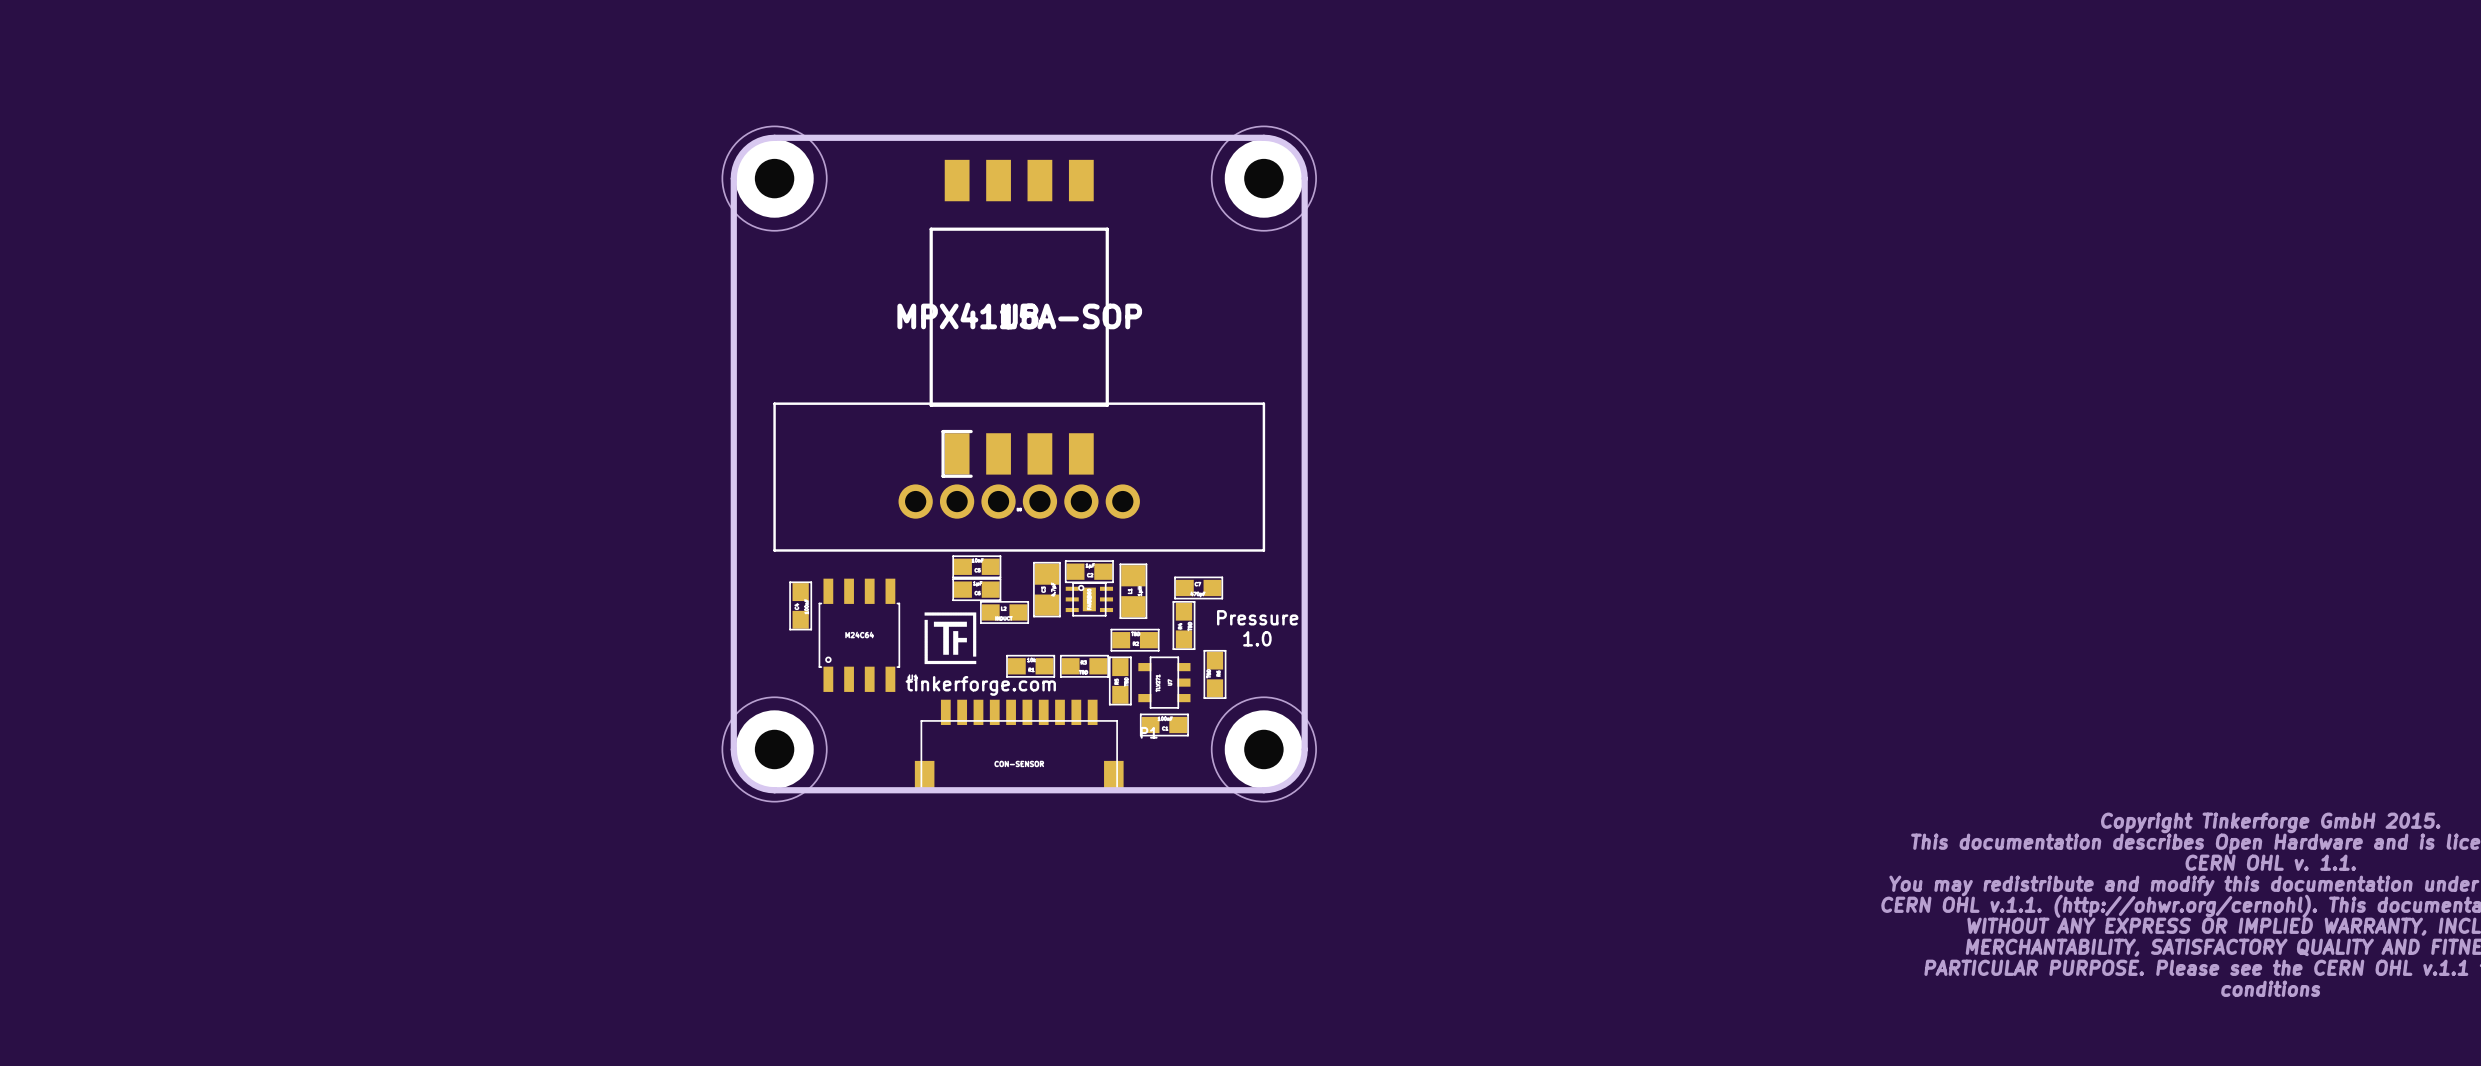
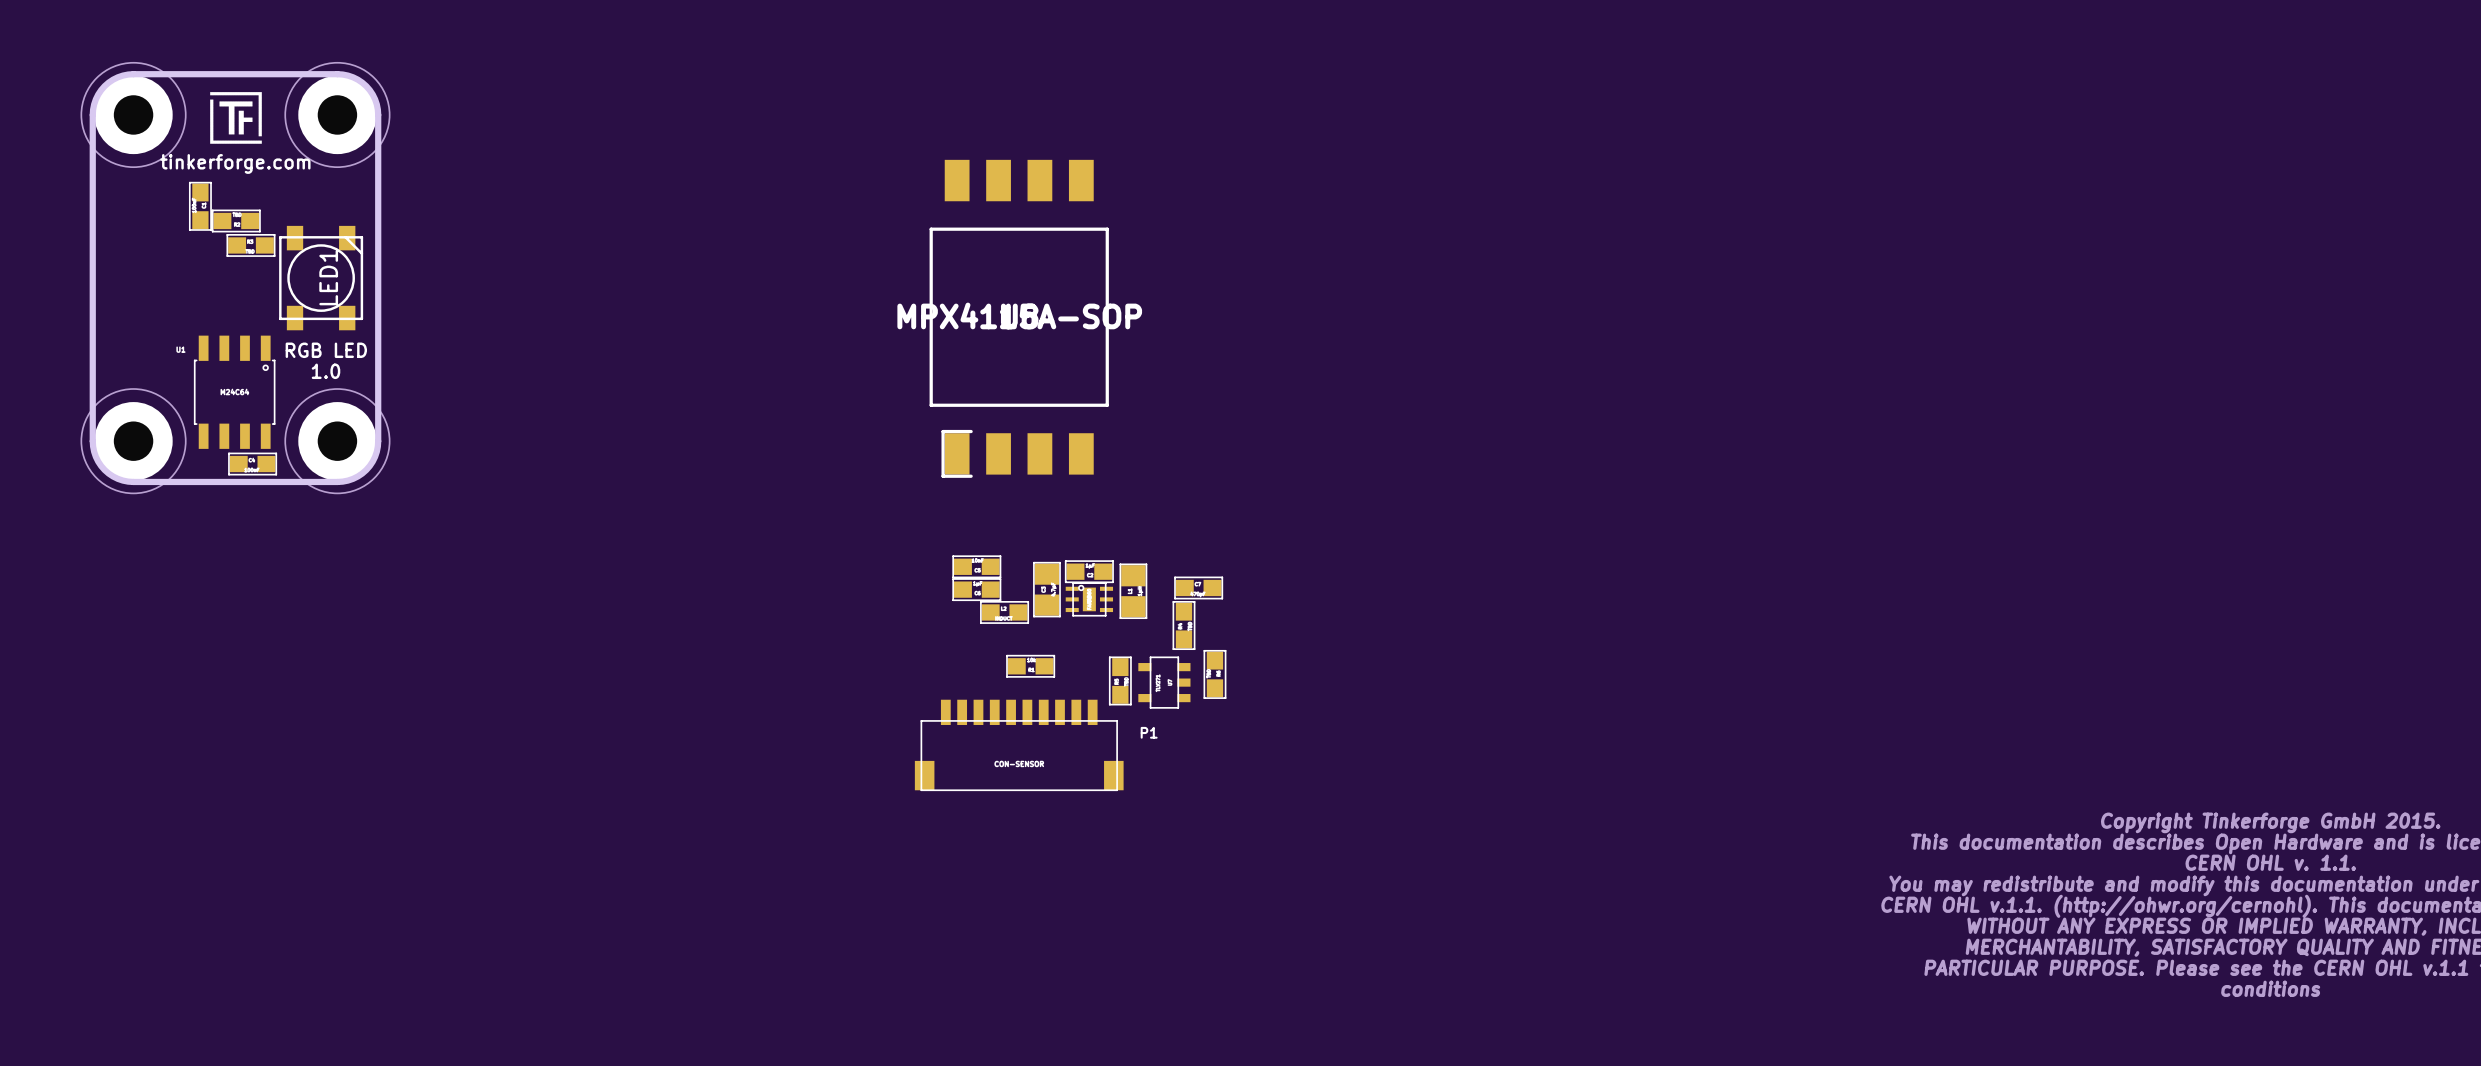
board edge: none -> (133, 74) (342, 74) (362, 82) (372, 94) (378, 114) (378, 441) (372, 461) (357, 476) (337, 481) (133, 481) (113, 476) (98, 461) (92, 441) (93, 109) (98, 94) (108, 82) (122, 75) (133, 74)
drawing: none -> [210, 92, 262, 144]
part: none -> (133, 114)
part: none -> (337, 114)
board edge: (774, 137) (1263, 137) (1279, 140) (1296, 153) (1303, 168) (1304, 178) (1304, 749) (1299, 769) (1288, 781) (1274, 788) (1263, 790) (774, 790) (754, 784) (742, 774) (735, 760) (733, 749) (733, 178) (736, 162) (745, 149) (758, 140) (774, 137) -> none
text: none -> tinkerforge.com (235, 163)
part: (774, 178) -> none
part: (1263, 178) -> none
LED1: none -> (321, 278)
text: none -> RGB LED (326, 350)
text: none -> 1.0 (326, 371)
part: none -> (133, 441)
part: none -> (337, 441)
part: (1019, 477) -> none
part rotation: 0° (800, 605) -> 90° clockwise (252, 464)
part position: (800, 605) -> (252, 464)
drawing: [924, 612, 977, 665] -> none
text: Pressure (1257, 617) -> none
part rotation: 0° (859, 635) -> 180° (234, 392)
part position: (859, 635) -> (234, 392)
text: 1.0 (1257, 638) -> none
part position: (1135, 640) -> (236, 220)
part position: (1084, 666) -> (250, 245)
text: tinkerforge.com (980, 685) -> none
part rotation: 0° (1164, 725) -> 90° clockwise (200, 206)
part position: (1164, 725) -> (200, 206)
part: (774, 749) -> none
part: (1263, 749) -> none

